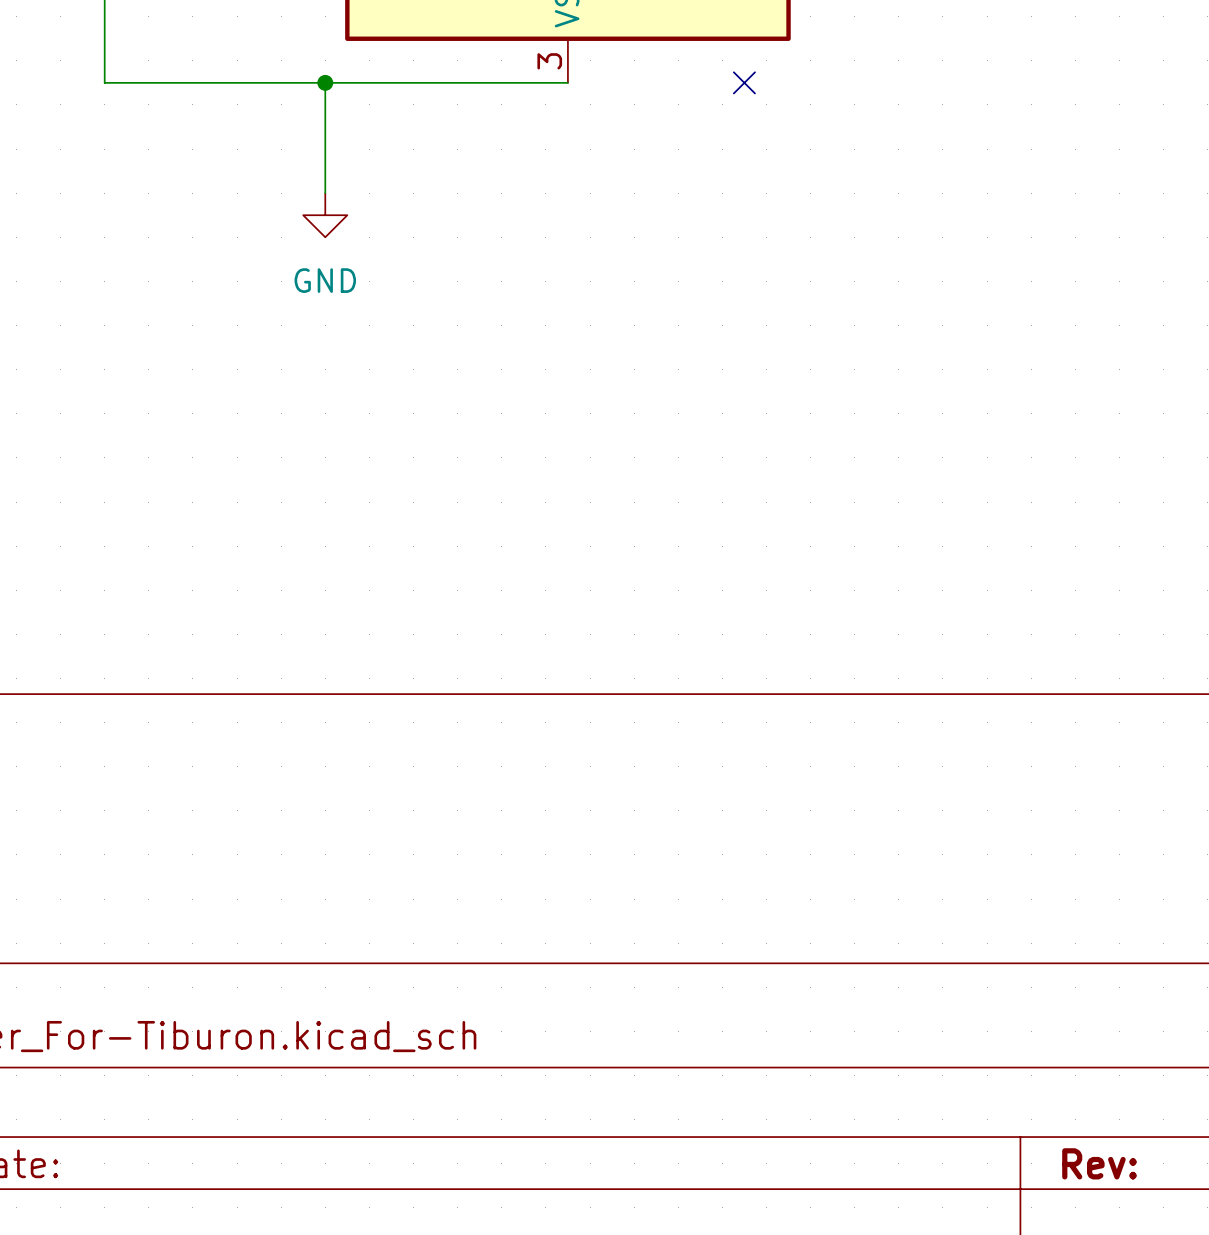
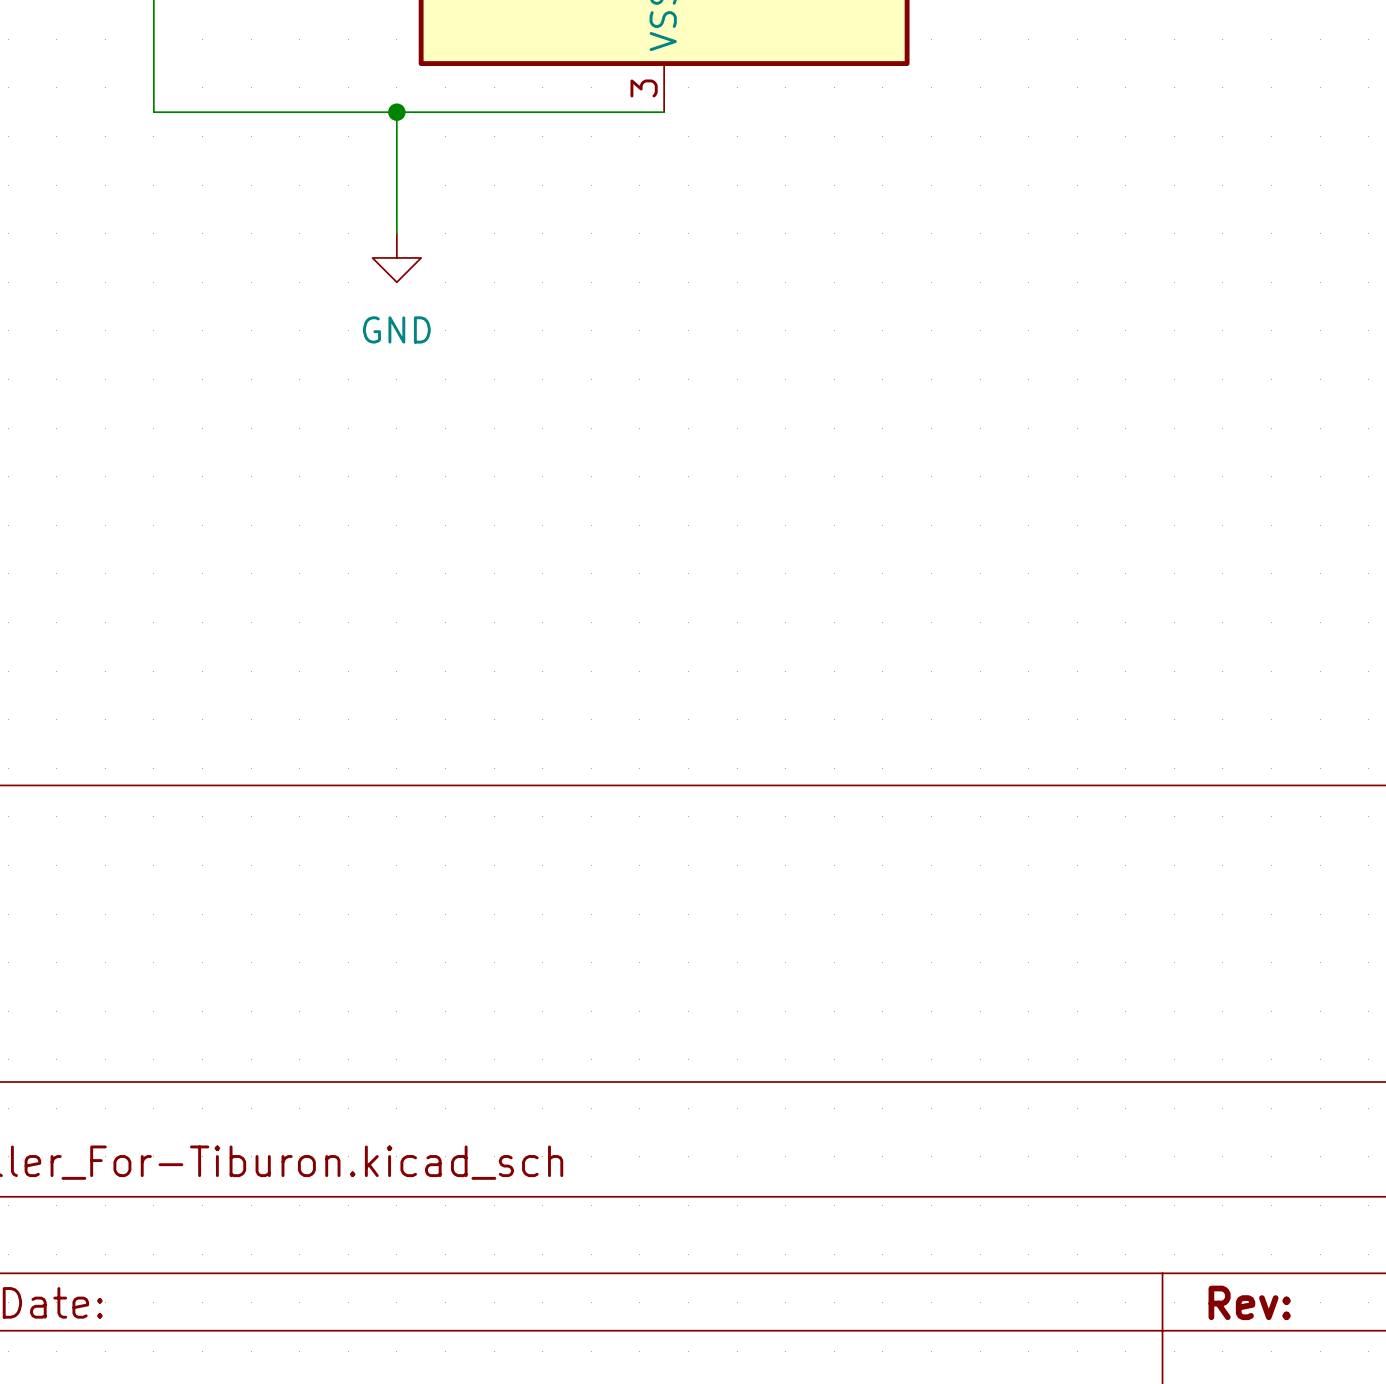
no-connect mark: (744, 82) -> none

